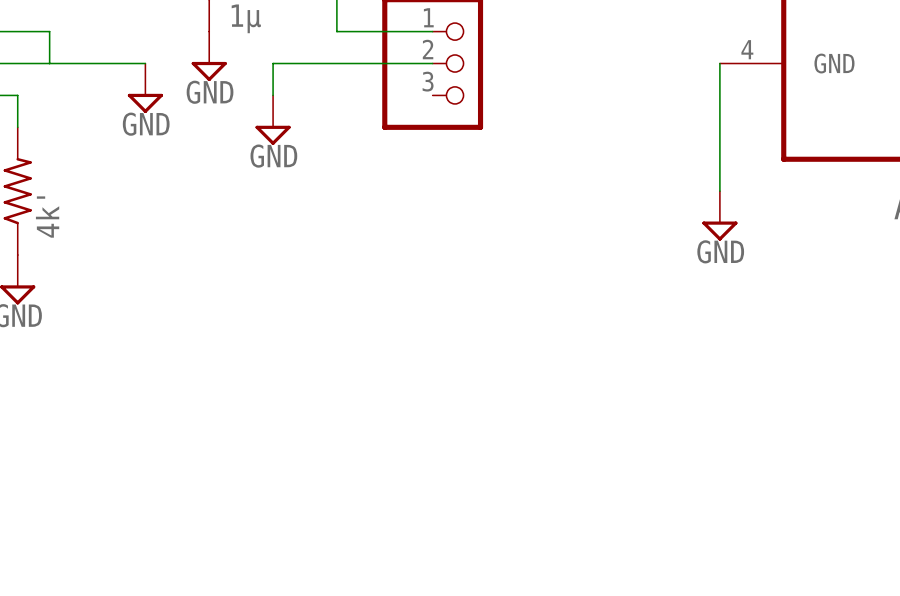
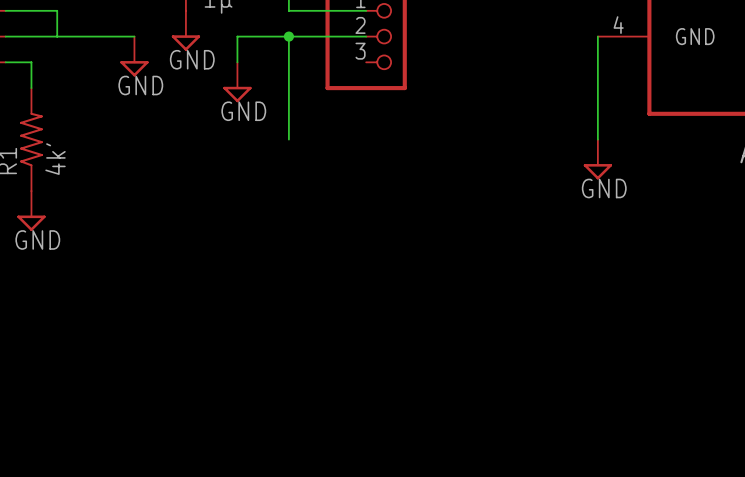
wire: none -> (288, 36) (288, 139)
junction: none -> (288, 36)

